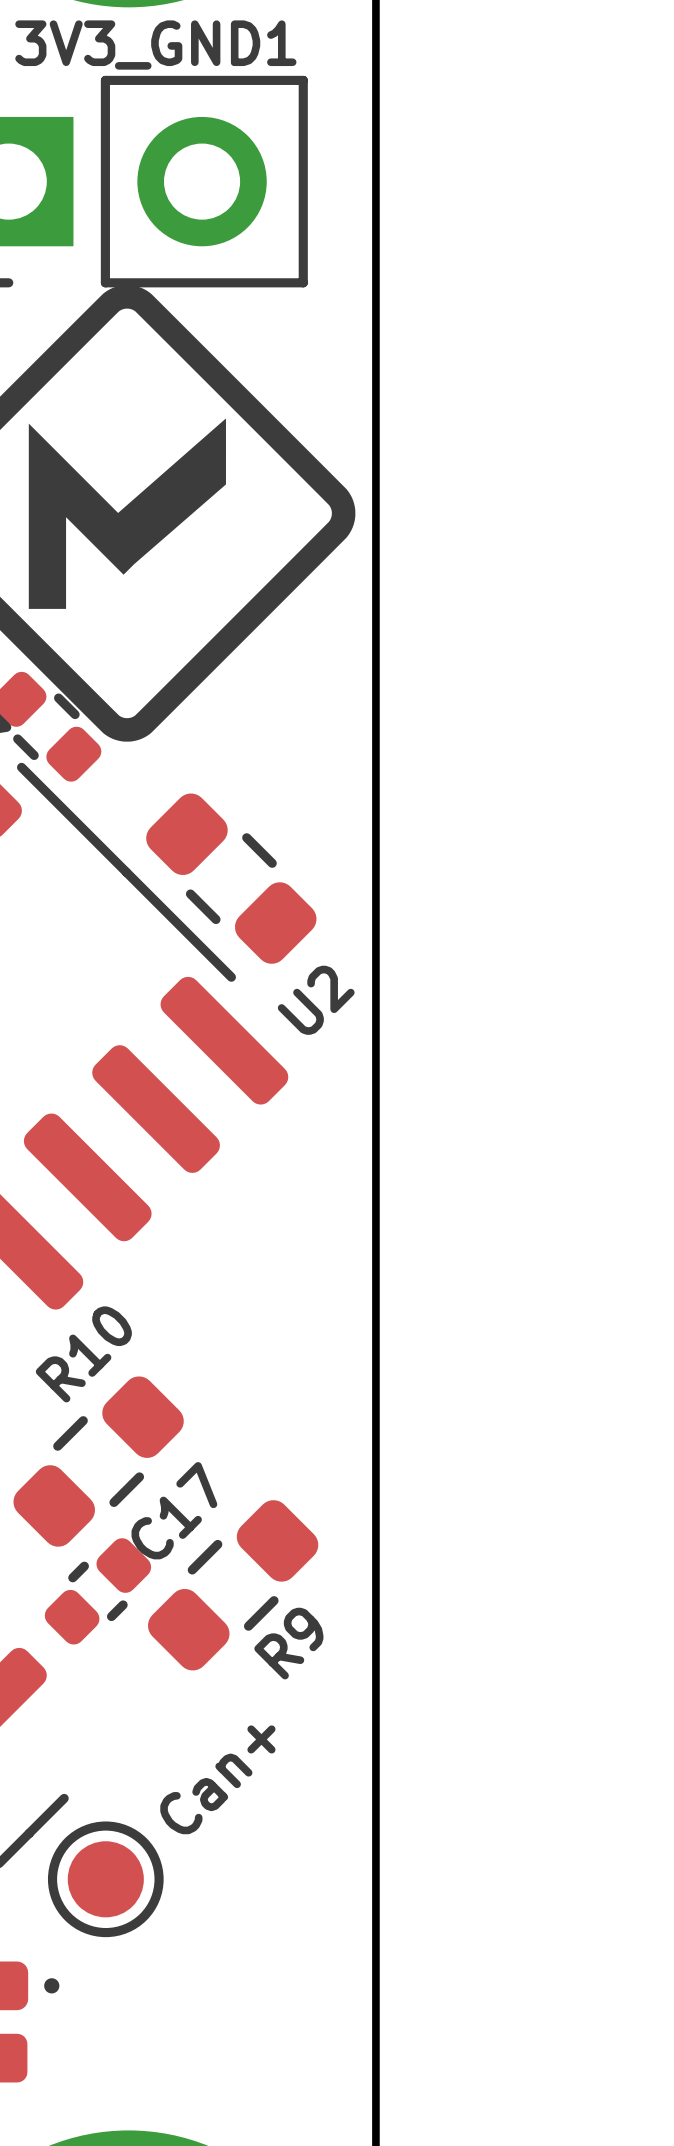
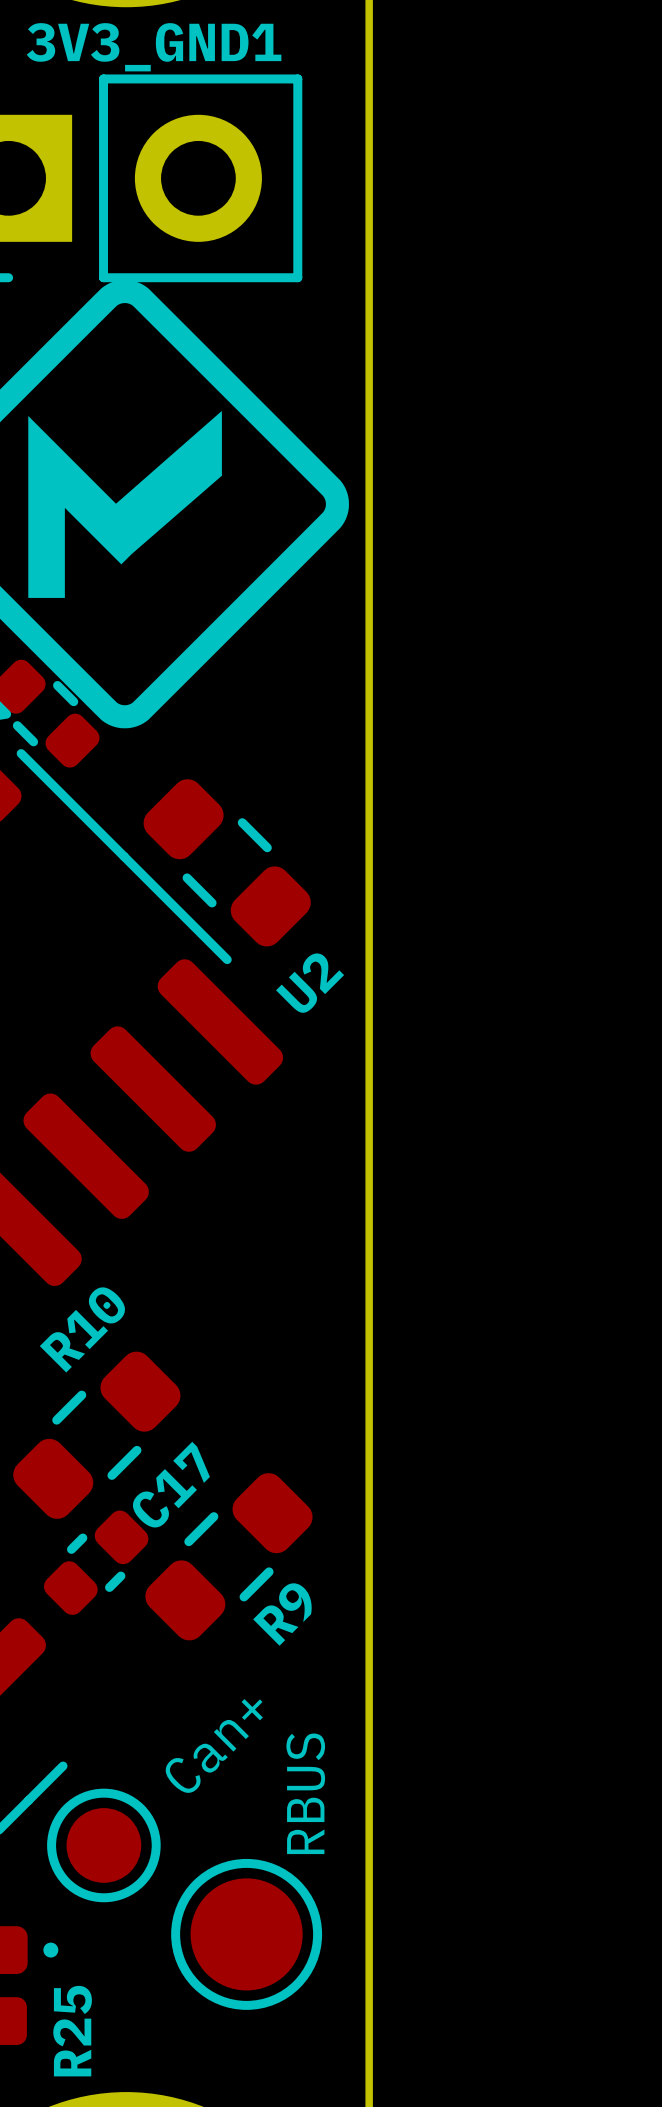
part: none -> (246, 1934)
R25 name: none -> R25 (72, 2031)

